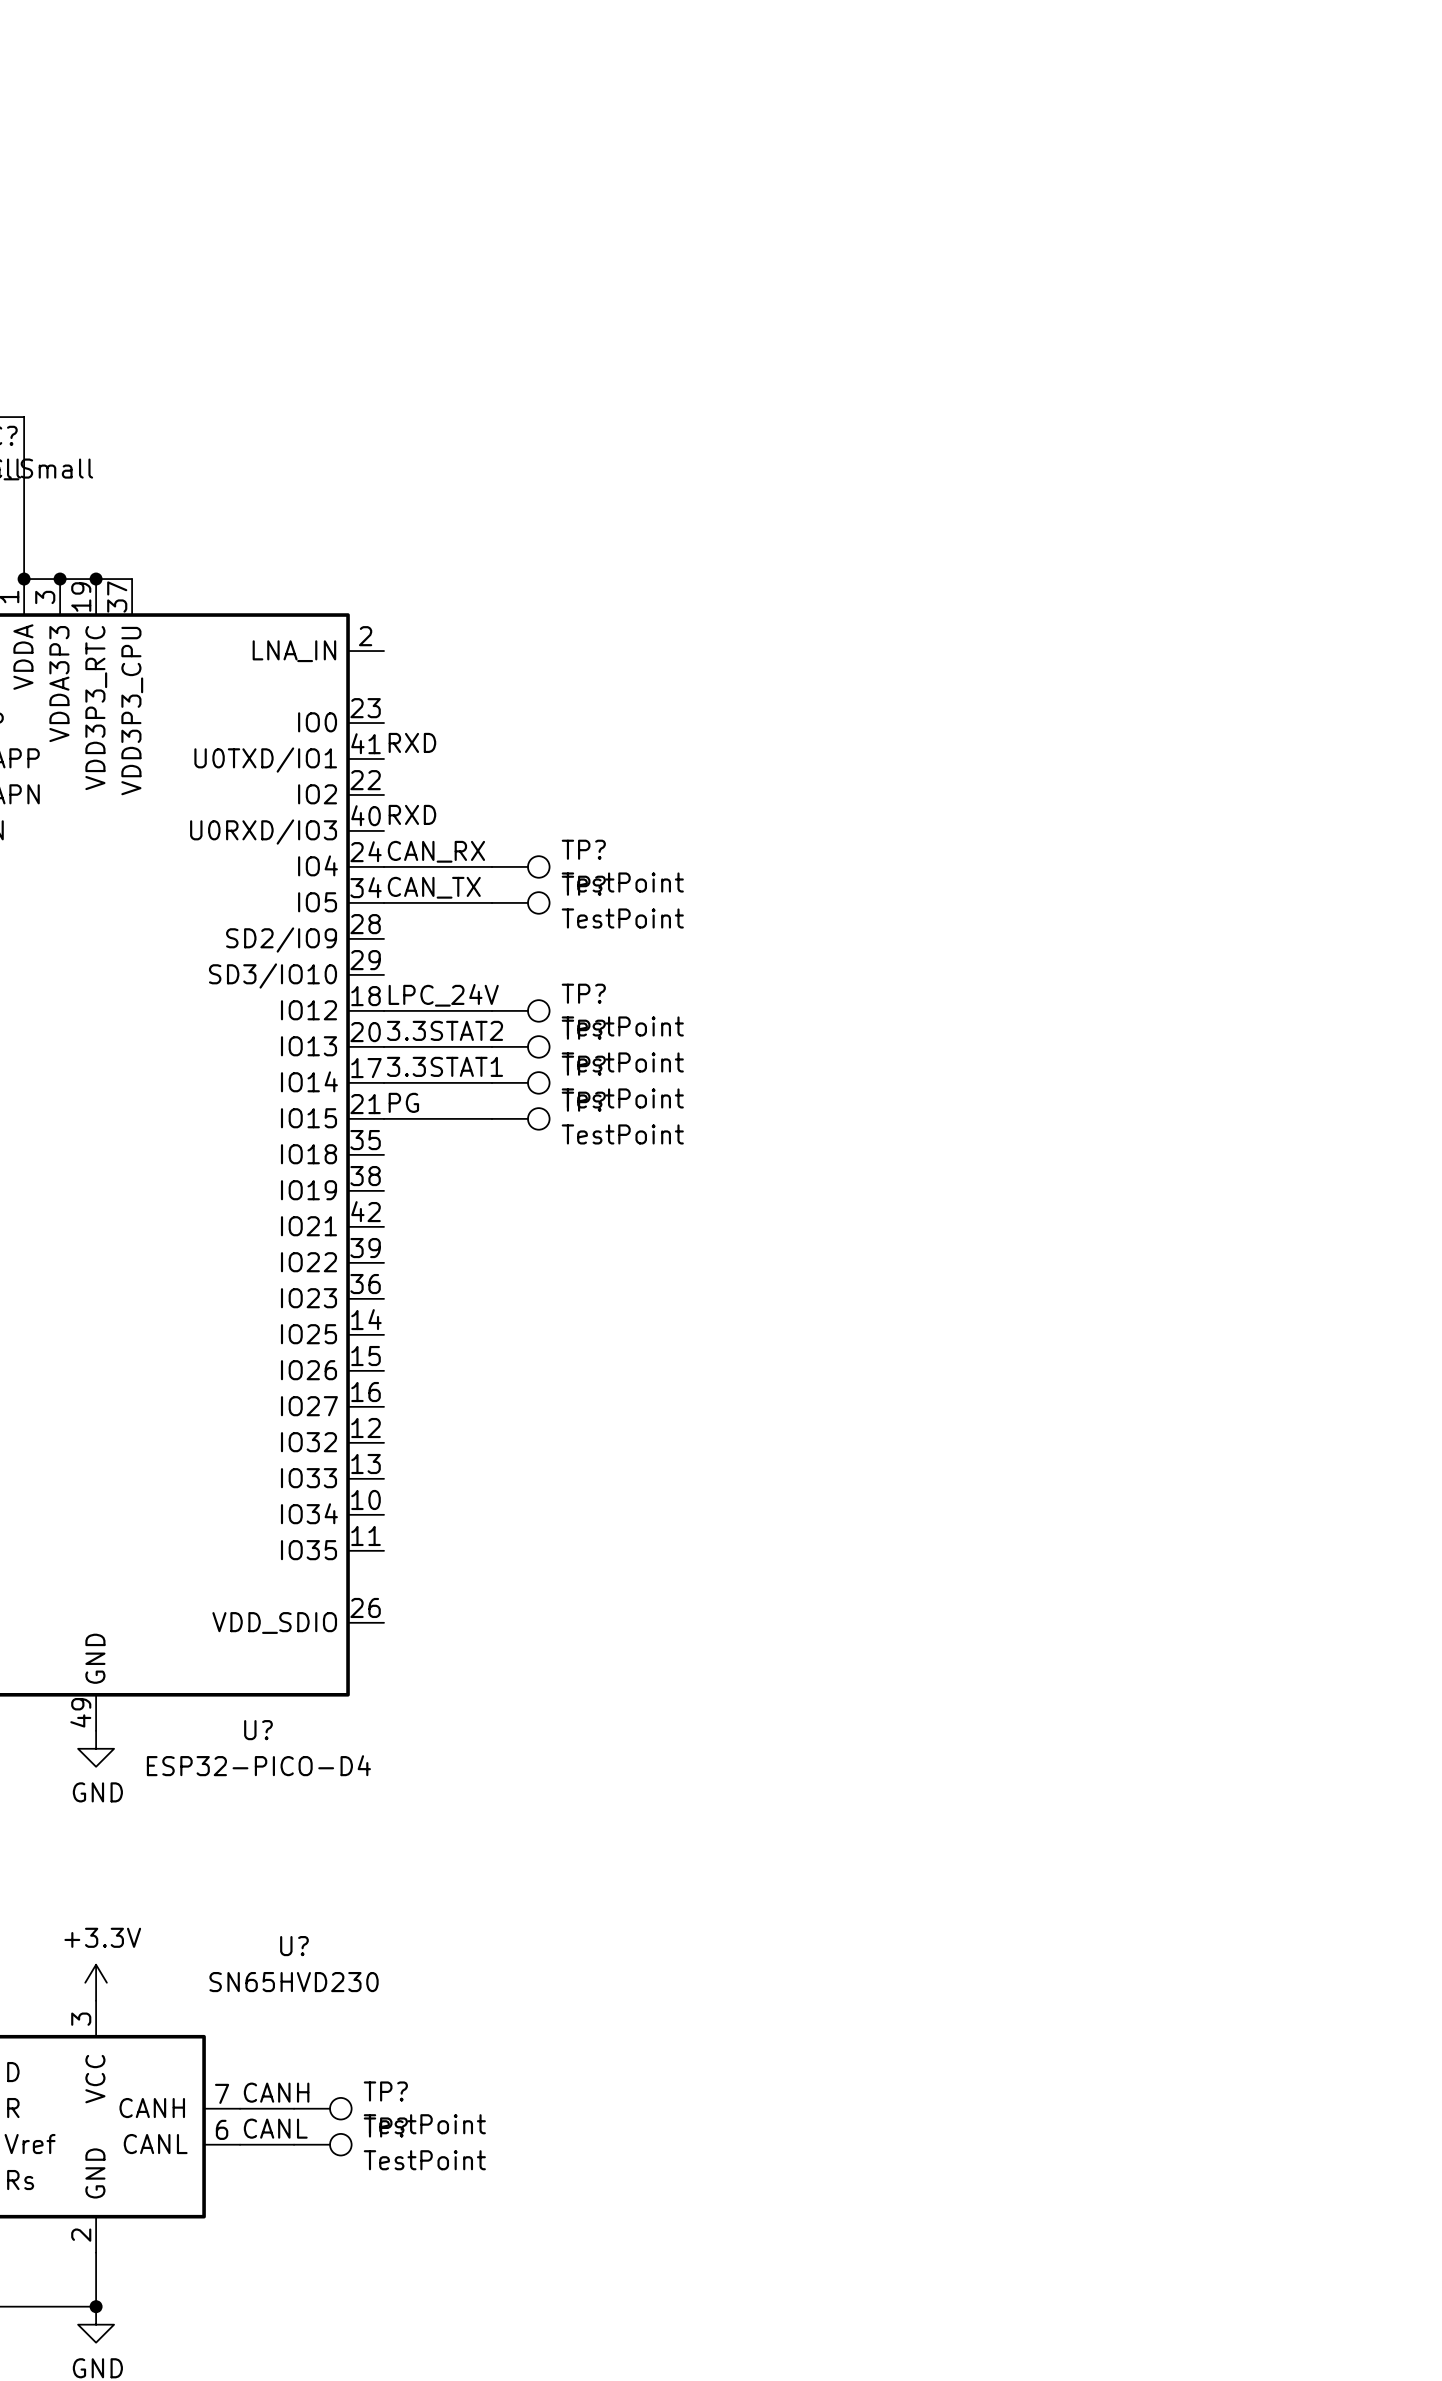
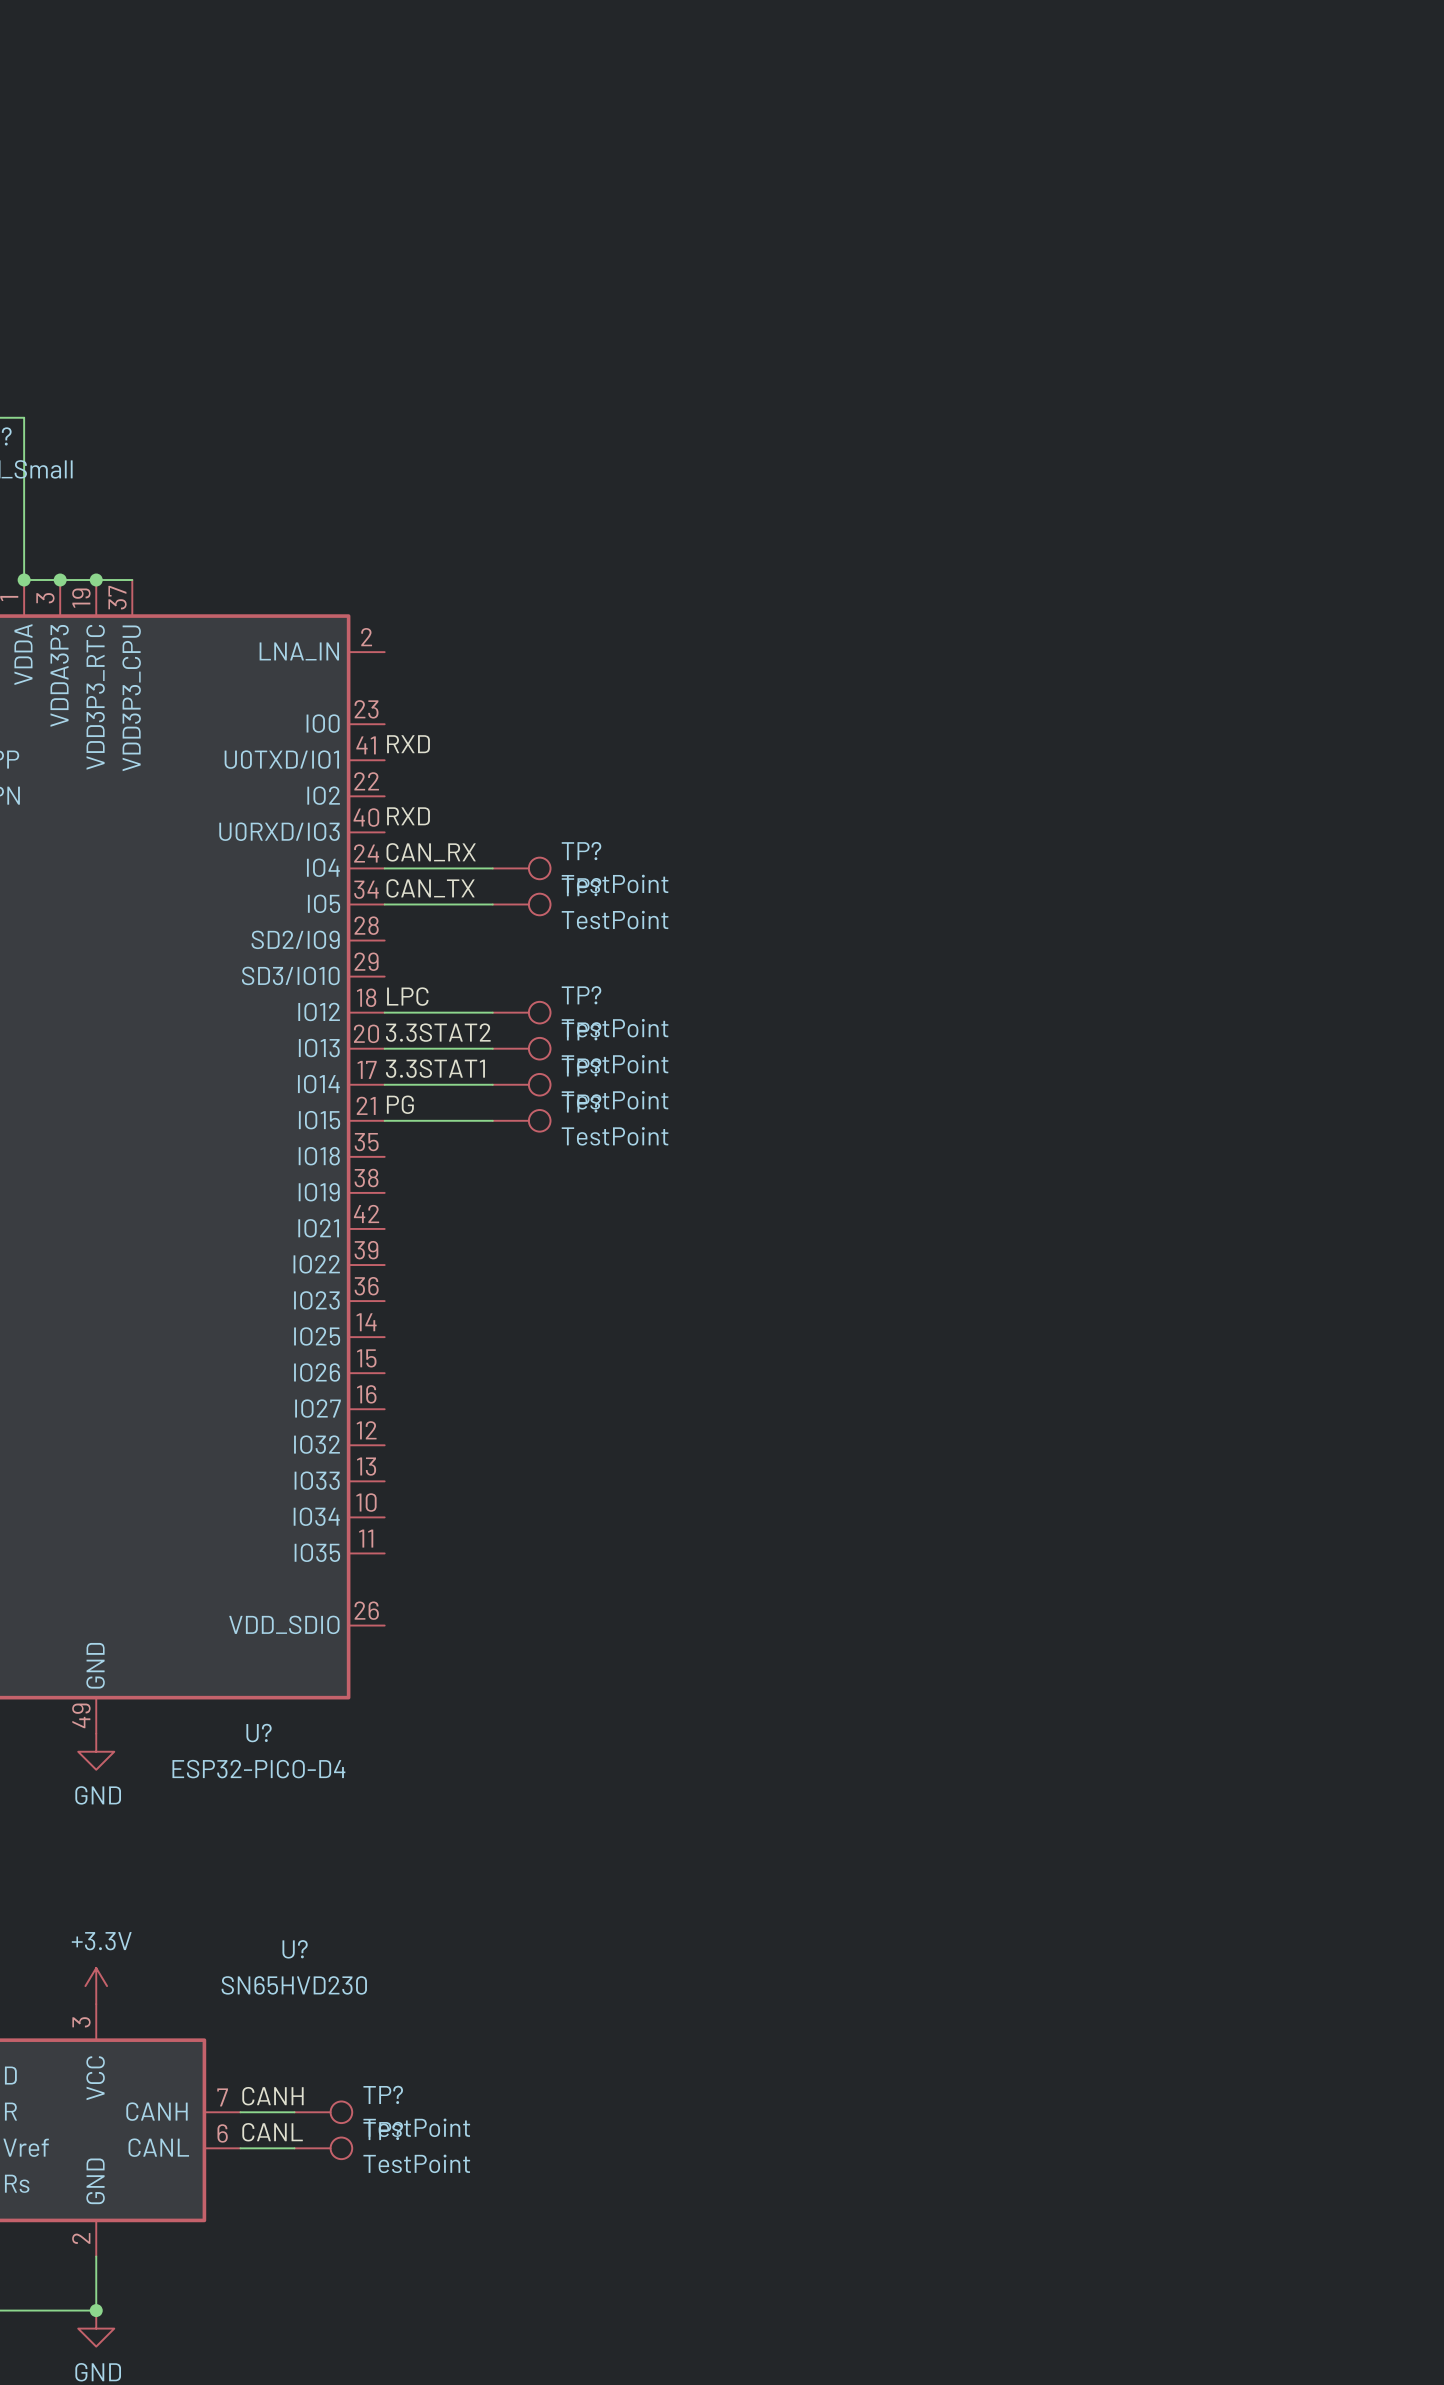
label: LPC_24V (443, 995) -> LPC (407, 996)

